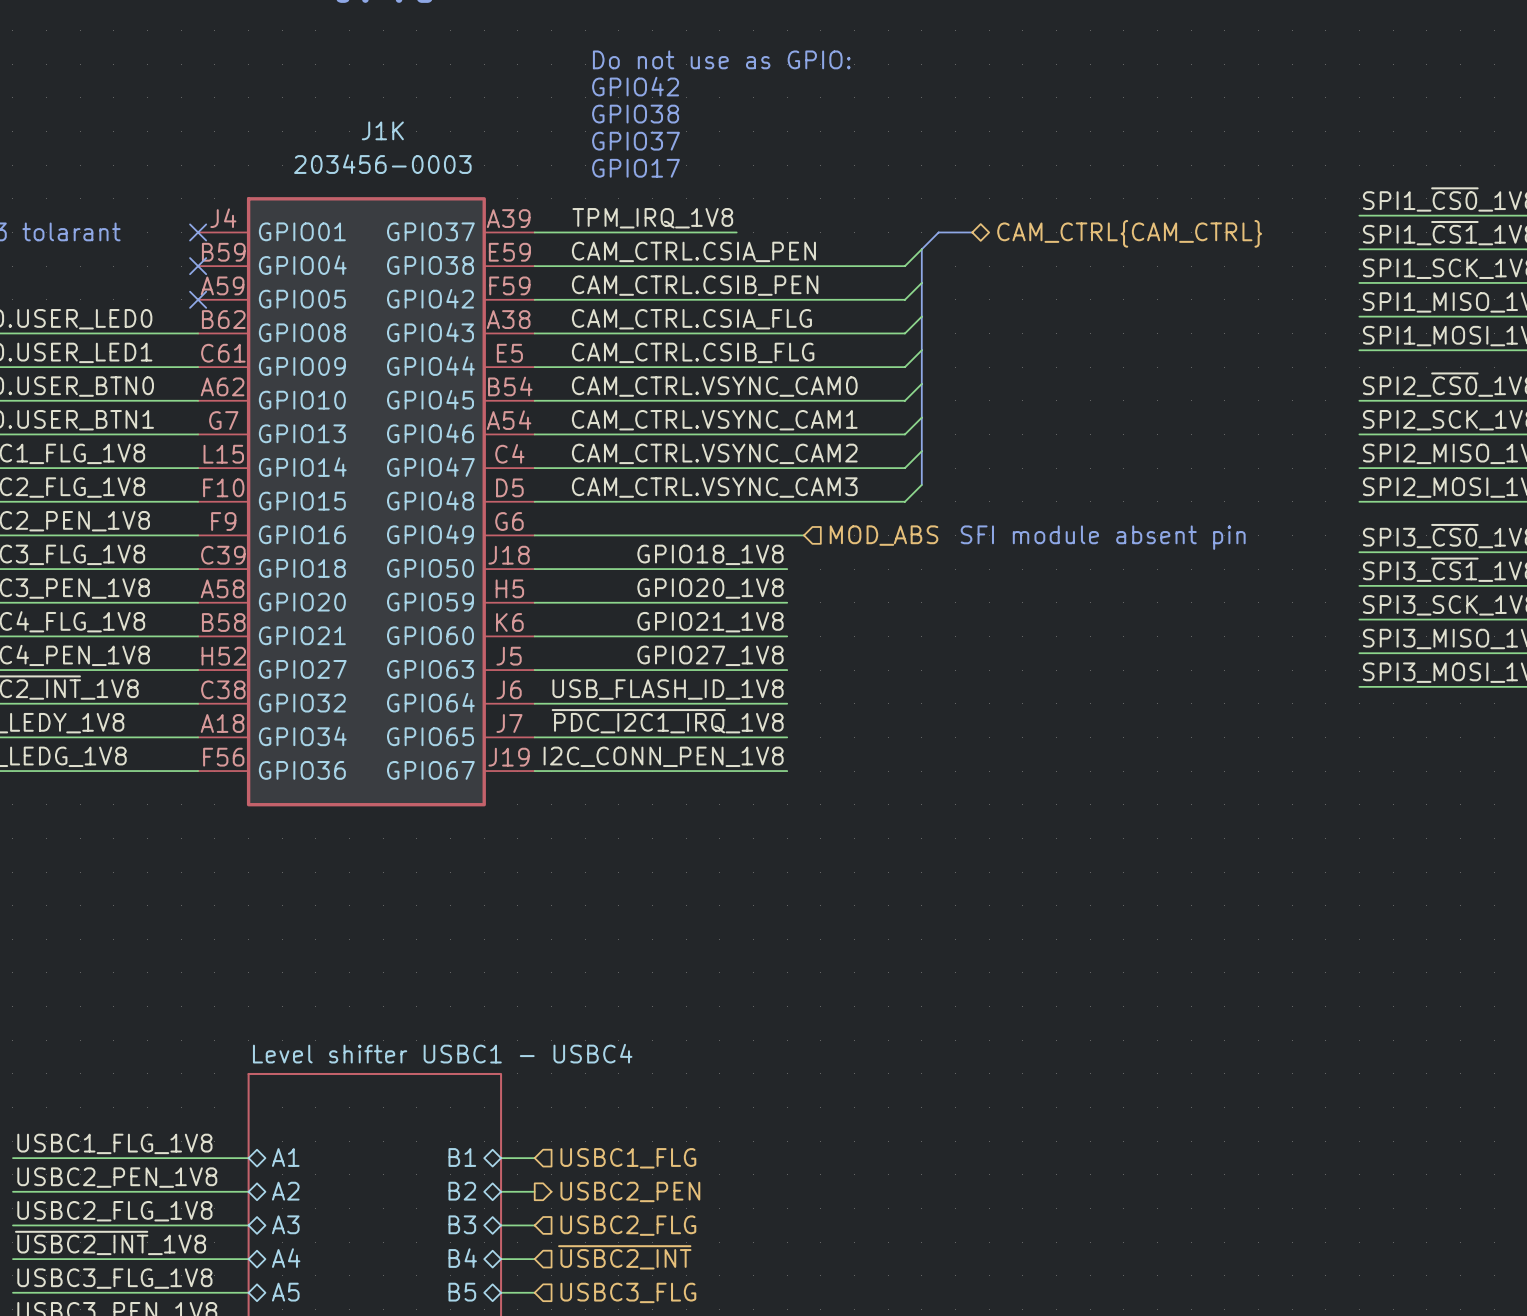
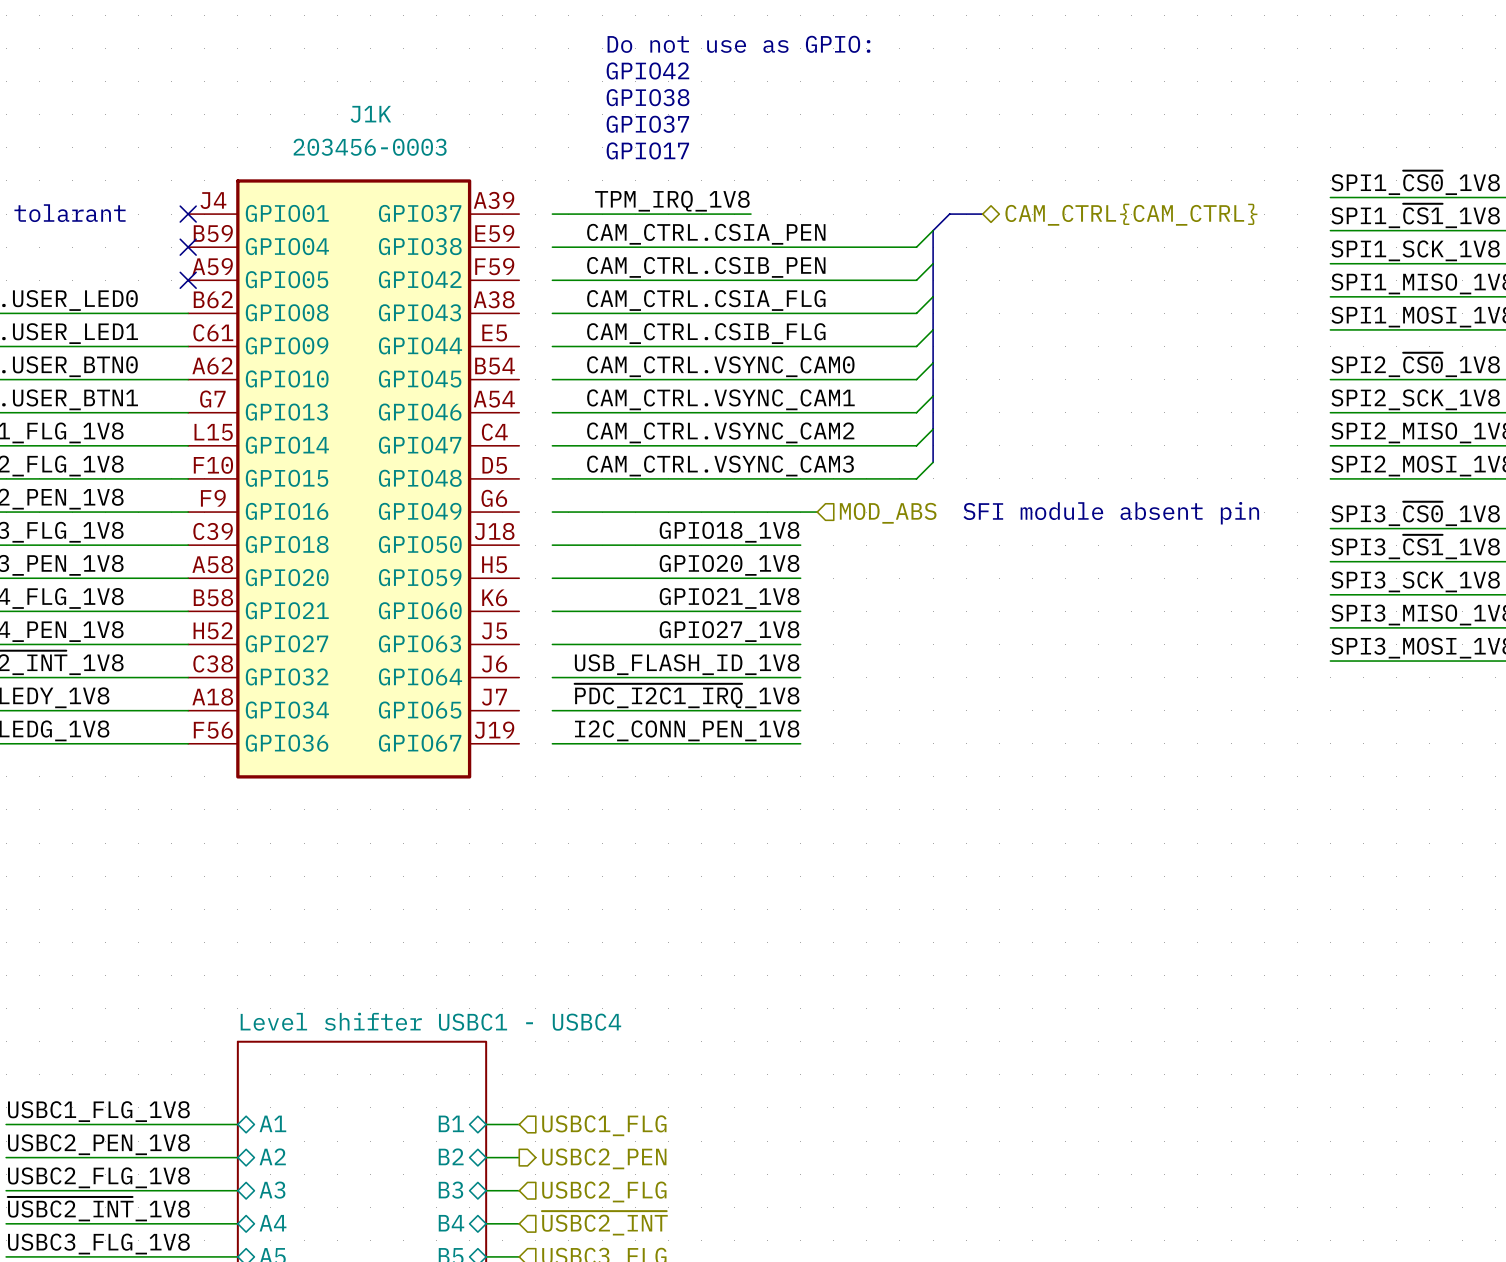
text position: Do not use as GPIO: (721, 59) -> Do not use as GPIO: (738, 44)
text position: GPIO42 (635, 86) -> GPIO42 (647, 70)
text position: GPIO38 (635, 114) -> GPIO38 (648, 97)
text position: GPIO37 (635, 141) -> GPIO37 (647, 124)
text position: GPIO17 (635, 168) -> GPIO17 (647, 150)
label position: TPM_IRQ_1V8 (652, 218) -> TPM_IRQ_1V8 (672, 201)
wire: (534, 232) (568, 232) -> (717, 214) (751, 214)
bus: (972, 232) (938, 232) (921, 249) (921, 484) -> (982, 214) (949, 214) (933, 230) (933, 462)
hierarchical label position: CAM_CTRL{CAM_CTRL} (1129, 233) -> CAM_CTRL{CAM_CTRL} (1131, 214)
wire: (921, 249) (904, 266) -> (933, 230) (916, 247) (883, 247)
label position: CAM_CTRL.CSIA_PEN (693, 251) -> CAM_CTRL.CSIA_PEN (706, 234)
wire: (534, 266) (568, 266) -> none
wire: (921, 282) (904, 299) -> (933, 263) (916, 280) (883, 280)
label position: CAM_CTRL.CSIB_PEN (695, 285) -> CAM_CTRL.CSIB_PEN (706, 267)
wire: (534, 299) (568, 299) -> none
wire: (921, 316) (904, 333) -> (933, 296) (916, 313) (883, 313)
label position: CAM_CTRL.CSIA_FLG (691, 319) -> CAM_CTRL.CSIA_FLG (706, 300)
wire: (534, 333) (568, 333) -> none
wire: (921, 350) (904, 367) -> (933, 329) (916, 346) (883, 346)
label position: CAM_CTRL.CSIB_FLG (693, 352) -> CAM_CTRL.CSIB_FLG (706, 333)
wire: (534, 367) (568, 367) -> none
wire: (921, 383) (904, 400) -> (933, 363) (916, 379) (883, 379)
label position: CAM_CTRL.VSYNC_CAM0 (714, 386) -> CAM_CTRL.VSYNC_CAM0 (720, 366)
wire: (534, 400) (568, 400) -> none
wire: (921, 417) (904, 434) -> (933, 396) (916, 412) (883, 412)
label position: CAM_CTRL.VSYNC_CAM1 (714, 420) -> CAM_CTRL.VSYNC_CAM1 (720, 399)
wire: (534, 434) (568, 434) -> none
wire: (921, 451) (904, 468) -> (933, 429) (916, 445) (883, 445)
label position: CAM_CTRL.VSYNC_CAM2 (714, 453) -> CAM_CTRL.VSYNC_CAM2 (720, 432)
wire: (534, 468) (568, 468) -> none
wire: (921, 484) (904, 501) -> (933, 462) (916, 478) (883, 478)
label position: CAM_CTRL.VSYNC_CAM3 (714, 487) -> CAM_CTRL.VSYNC_CAM3 (720, 466)
wire: (534, 501) (568, 501) -> none
wire: (534, 535) (568, 535) -> (784, 512) (817, 512)
hierarchical label position: MOD_ABS (884, 535) -> MOD_ABS (888, 513)
text position: SFI module absent pin (1103, 537) -> SFI module absent pin (1111, 513)
label position: GPIO18_1V8 (710, 554) -> GPIO18_1V8 (729, 532)
wire: (534, 569) (568, 569) -> (767, 545) (800, 545)
label position: GPIO20_1V8 (710, 588) -> GPIO20_1V8 (729, 565)
wire: (534, 602) (568, 602) -> (767, 578) (800, 578)
label position: GPIO21_1V8 (710, 622) -> GPIO21_1V8 (729, 598)
wire: (534, 636) (568, 636) -> (767, 611) (800, 611)
label position: GPIO27_1V8 (710, 655) -> GPIO27_1V8 (729, 631)
wire: (534, 670) (568, 670) -> (767, 644) (800, 644)
label position: USB_FLASH_ID_1V8 (668, 689) -> USB_FLASH_ID_1V8 (687, 664)
wire: (534, 703) (568, 703) -> (767, 677) (800, 677)
label position: ~{PDC_I2C1_IRQ}_1V8 (667, 721) -> ~{PDC_I2C1_IRQ}_1V8 (687, 696)
wire: (534, 737) (568, 737) -> (767, 710) (800, 710)
label position: I2C_CONN_PEN_1V8 (663, 756) -> I2C_CONN_PEN_1V8 (687, 730)
wire: (534, 771) (568, 771) -> (767, 743) (800, 743)

